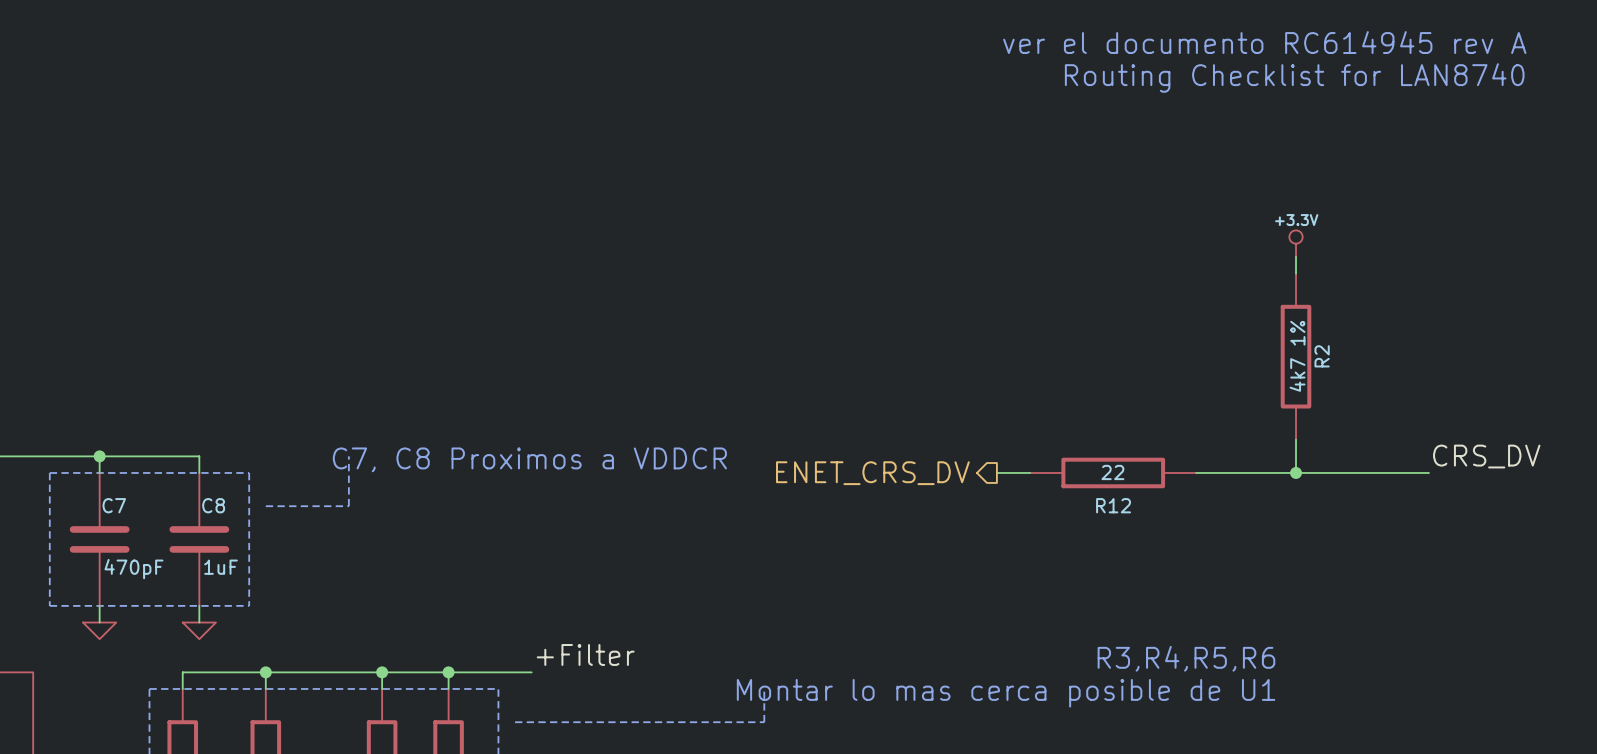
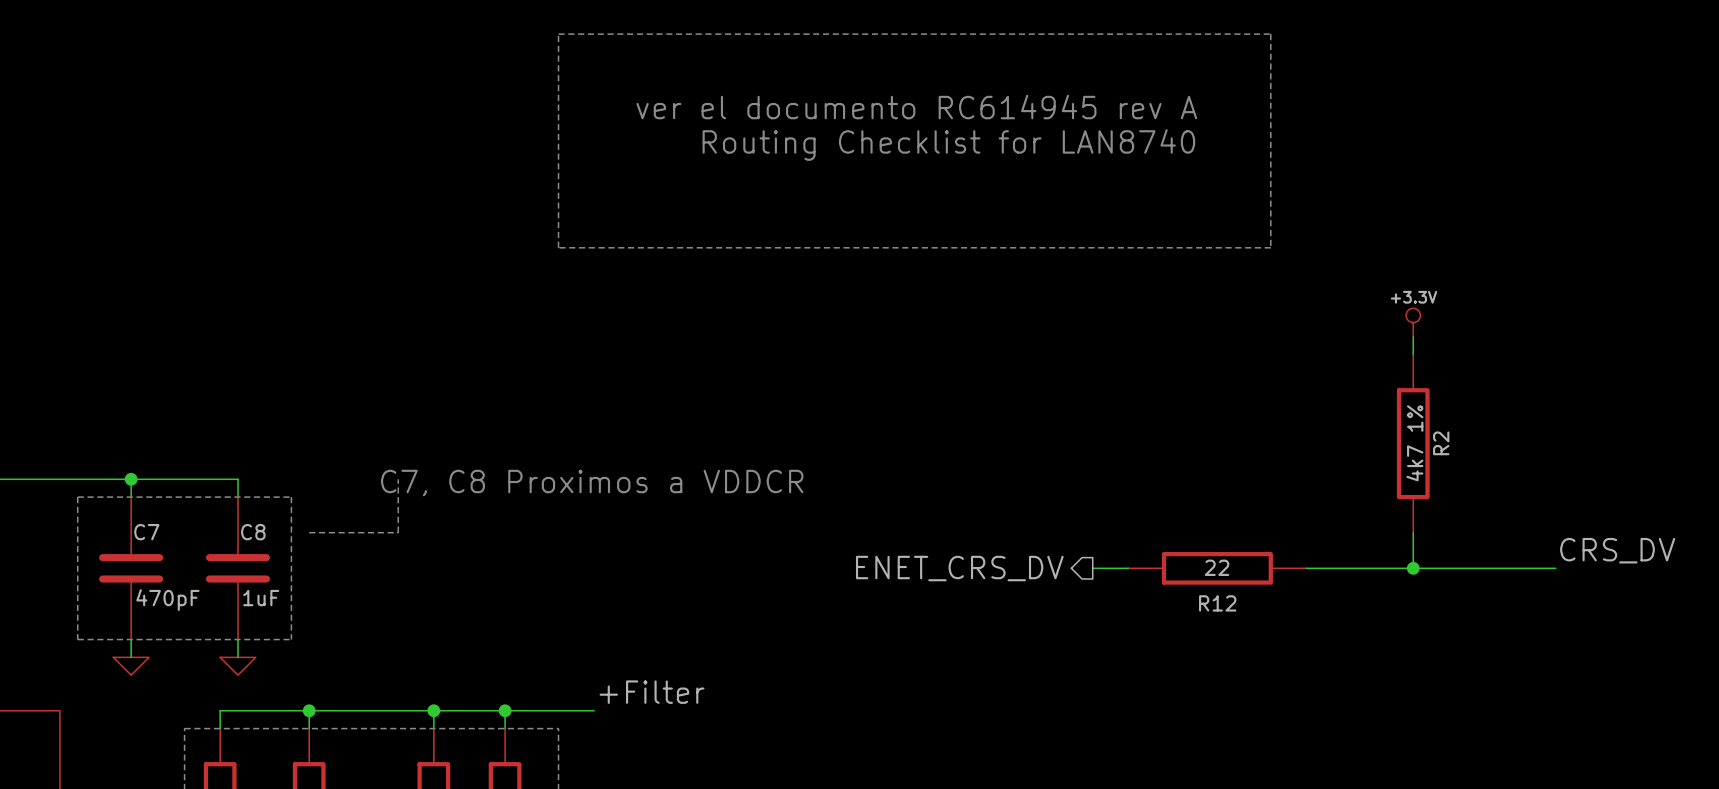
line: none -> (558, 34) (1270, 34) (1270, 247) (558, 247) (558, 34)
text: ver el documento RC614945 rev A (1264, 42) -> none
text: Routing Checklist for LAN8740 (1294, 77) -> none
text: none -> ver el documento RC614945 rev A (916, 107)
text: none -> Routing Checklist for LAN8740 (948, 145)
power symbol position: +3.3V (1296, 243) -> +3.3V (1413, 322)
wire: (1296, 256) (1296, 273) -> (1413, 336) (1413, 354)
R2 position: (1296, 356) -> (1413, 443)
wire: (1296, 439) (1296, 472) -> (1413, 532) (1413, 568)
label position: CRS_DV (1486, 456) -> CRS_DV (1617, 550)
wire: (996, 472) (1030, 472) -> (1092, 568) (1128, 568)
R12 position: (1113, 472) -> (1217, 568)
wire: (1196, 472) (1428, 472) -> (1306, 568) (1555, 568)
junction position: (1296, 472) -> (1413, 568)
hierarchical label position: ENET_CRS_DV (872, 473) -> ENET_CRS_DV (959, 568)
text: R3,R4,R5,R6 (1186, 658) -> none
line: (764, 688) (764, 722) (515, 722) -> none
text: Montar lo mas cerca posible de U1 (1006, 693) -> none

